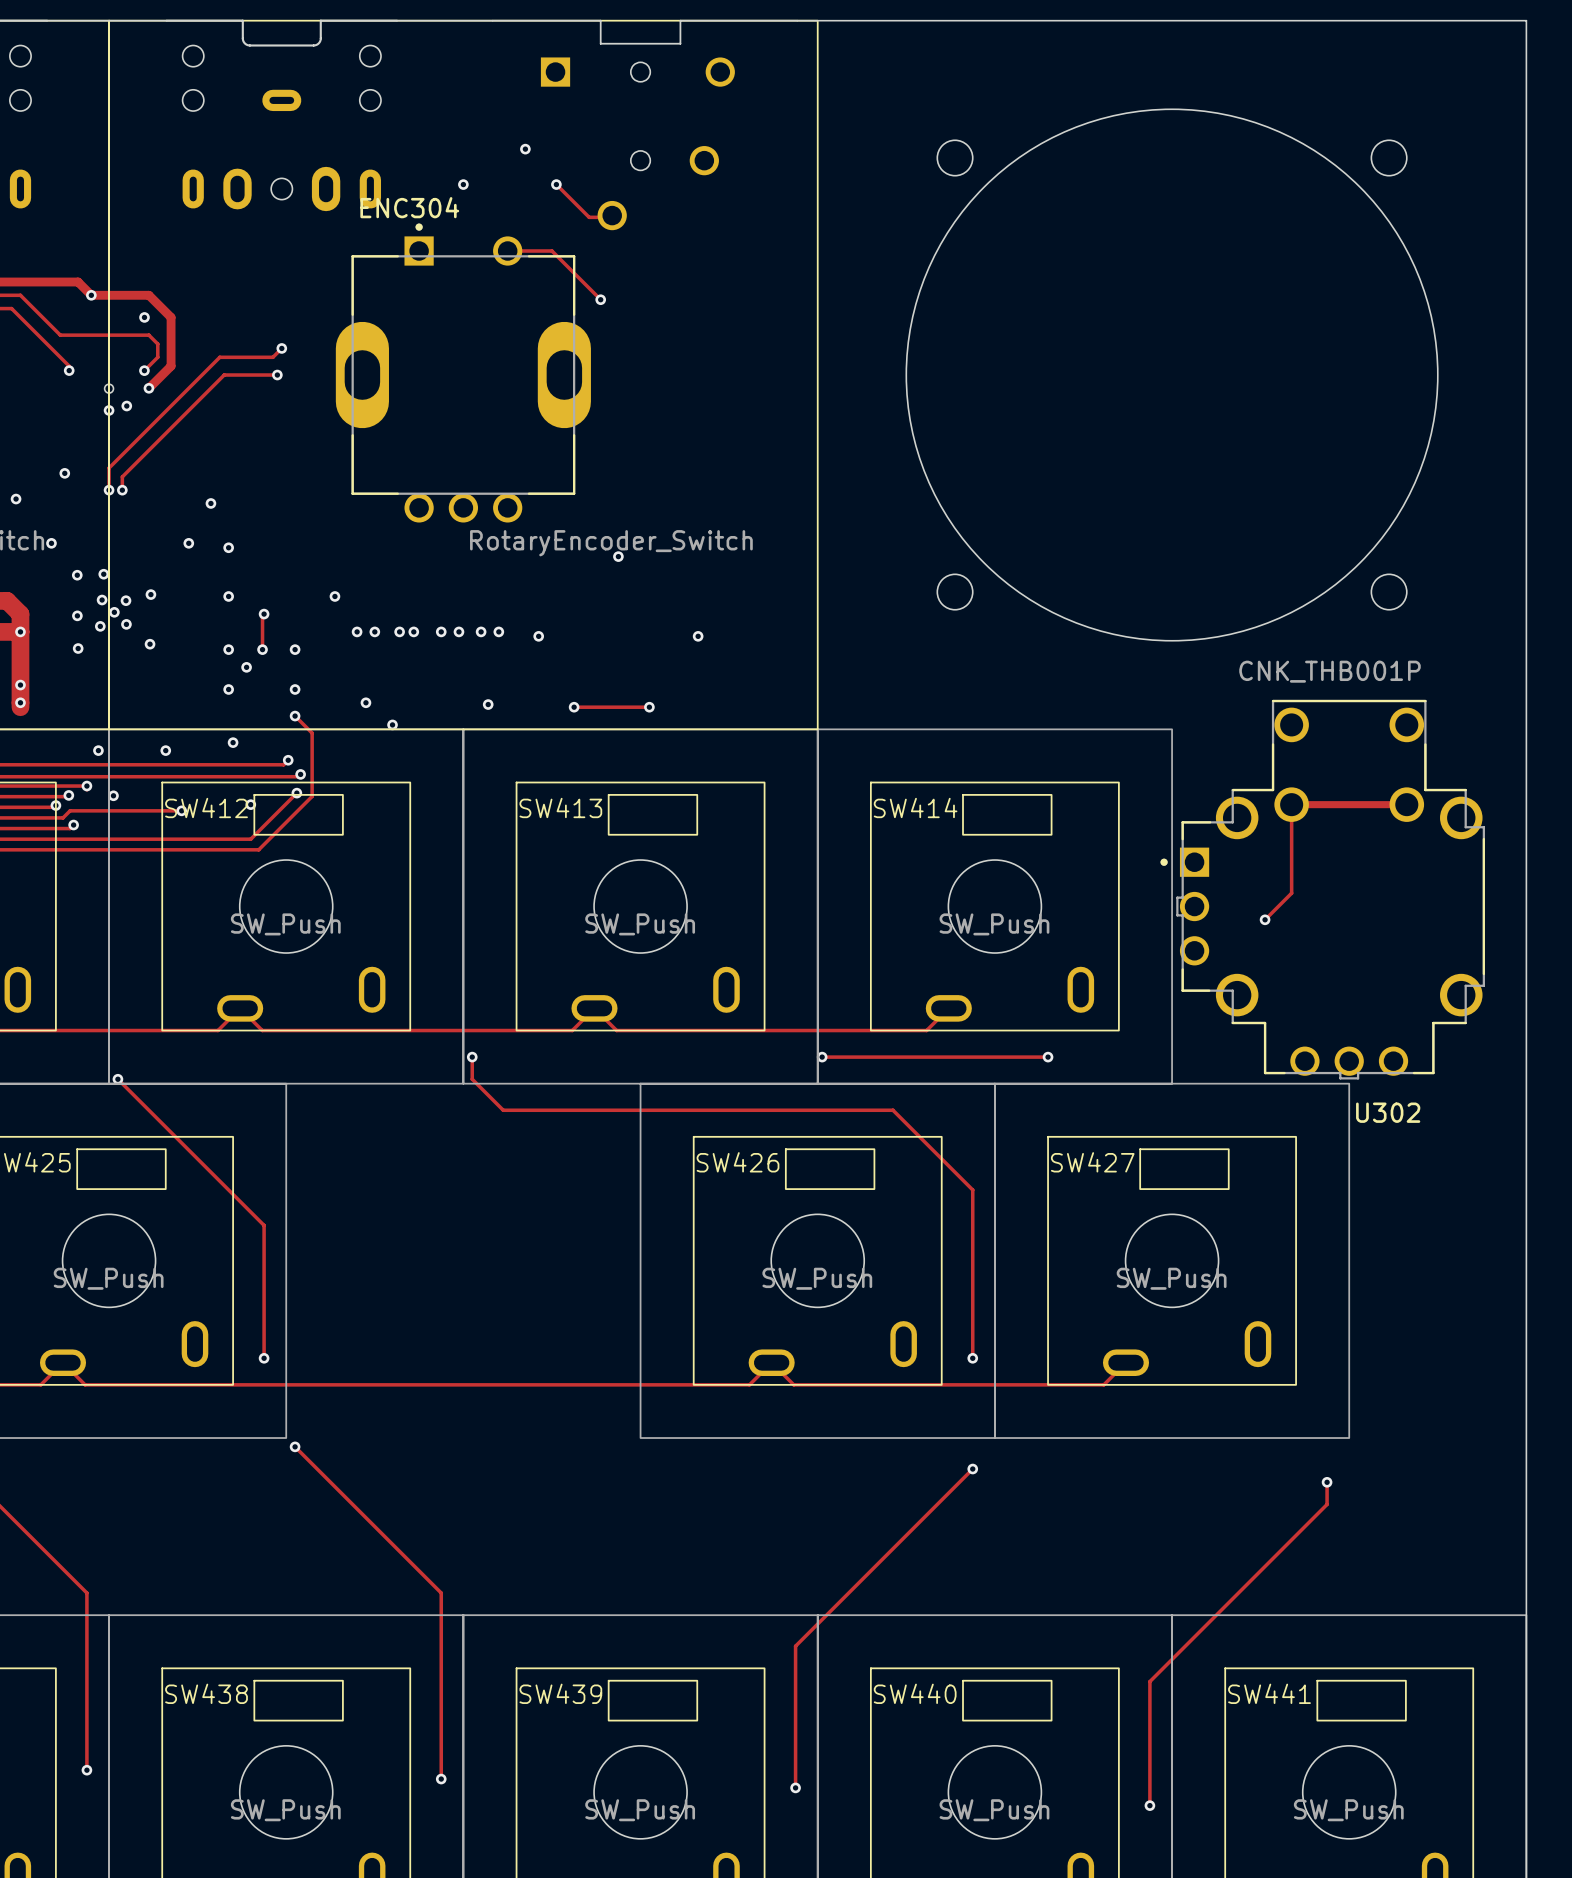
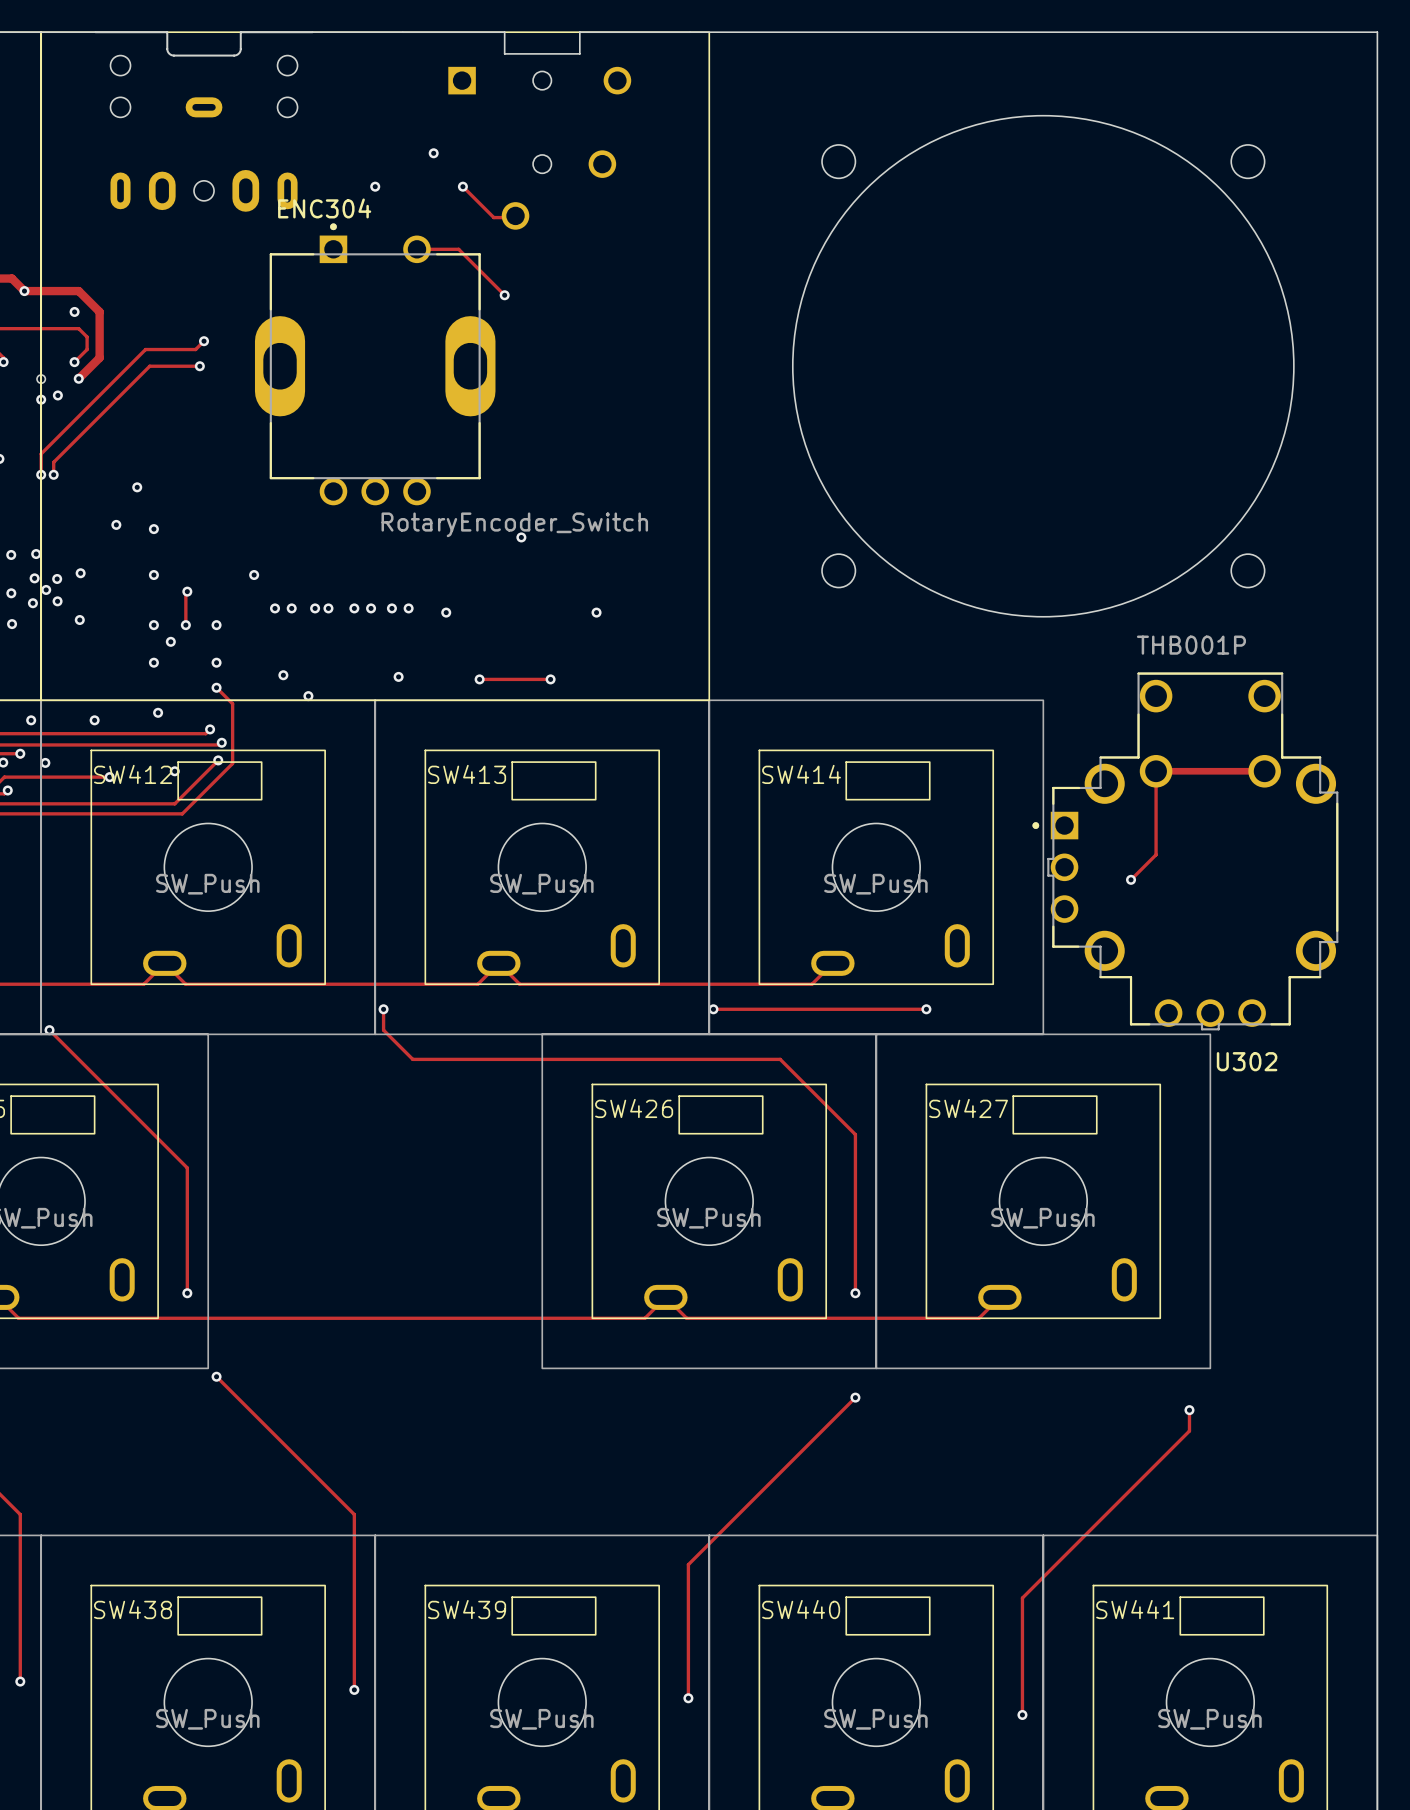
U302 value: CNK_THB001P (1330, 671) -> THB001P (1191, 645)

